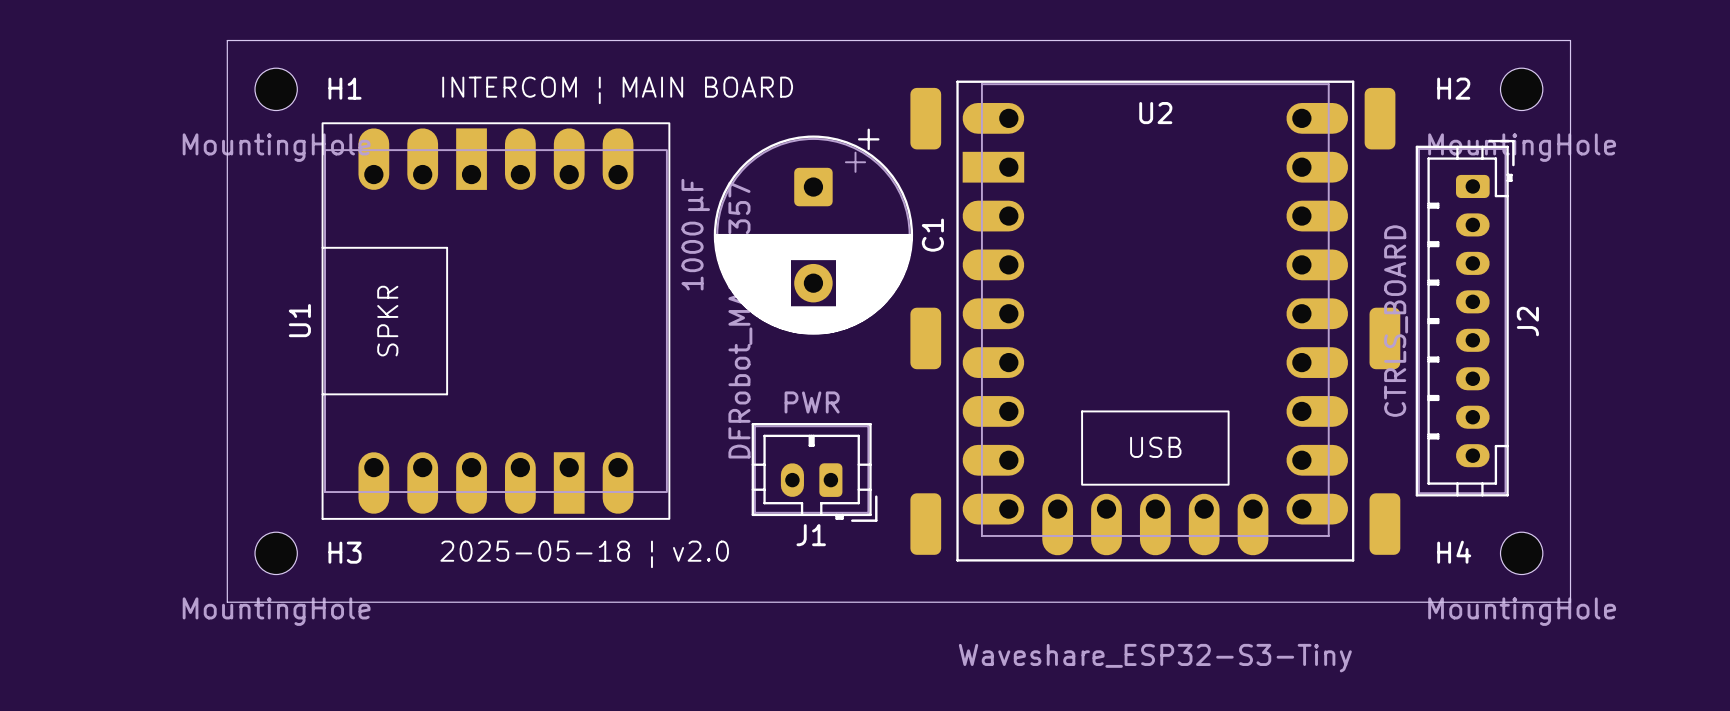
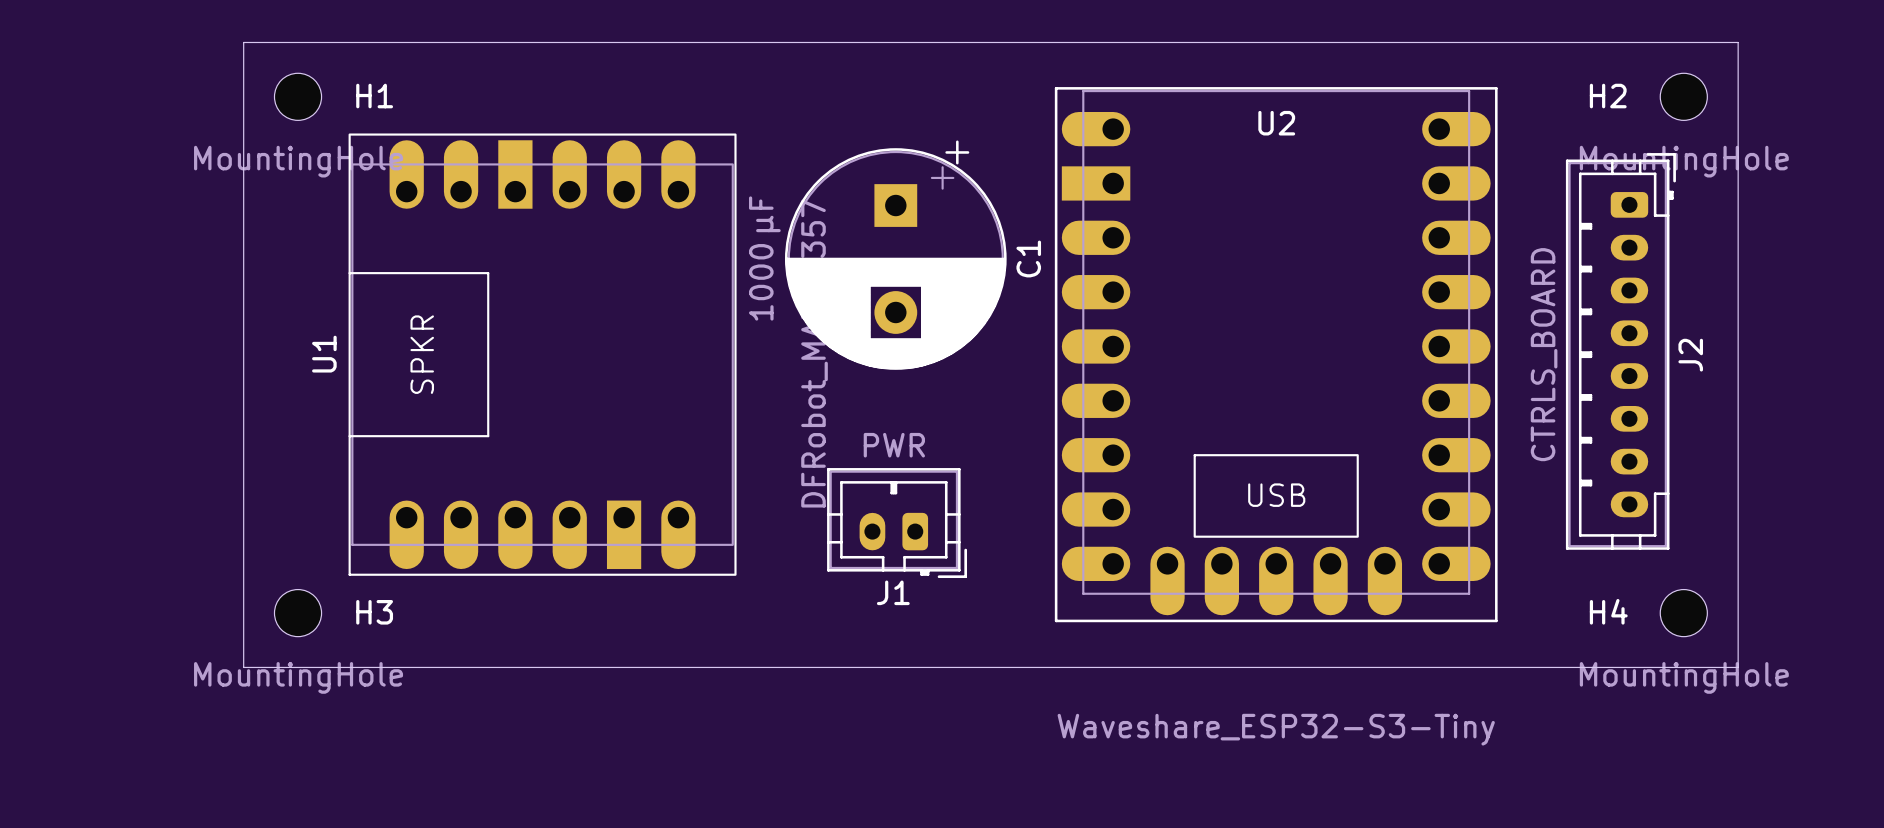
text: INTERCOM ¦ MAIN BOARD (617, 90) -> none
part: (925, 118) -> none
part: (1380, 118) -> none
C1 footprint: [713, 128, 914, 335] -> [784, 140, 1007, 370]
part: (925, 338) -> none
part: (1384, 338) -> none
part: (925, 524) -> none
part: (1384, 524) -> none
text: 2025-05-18 ¦ v2.0 (584, 554) -> none

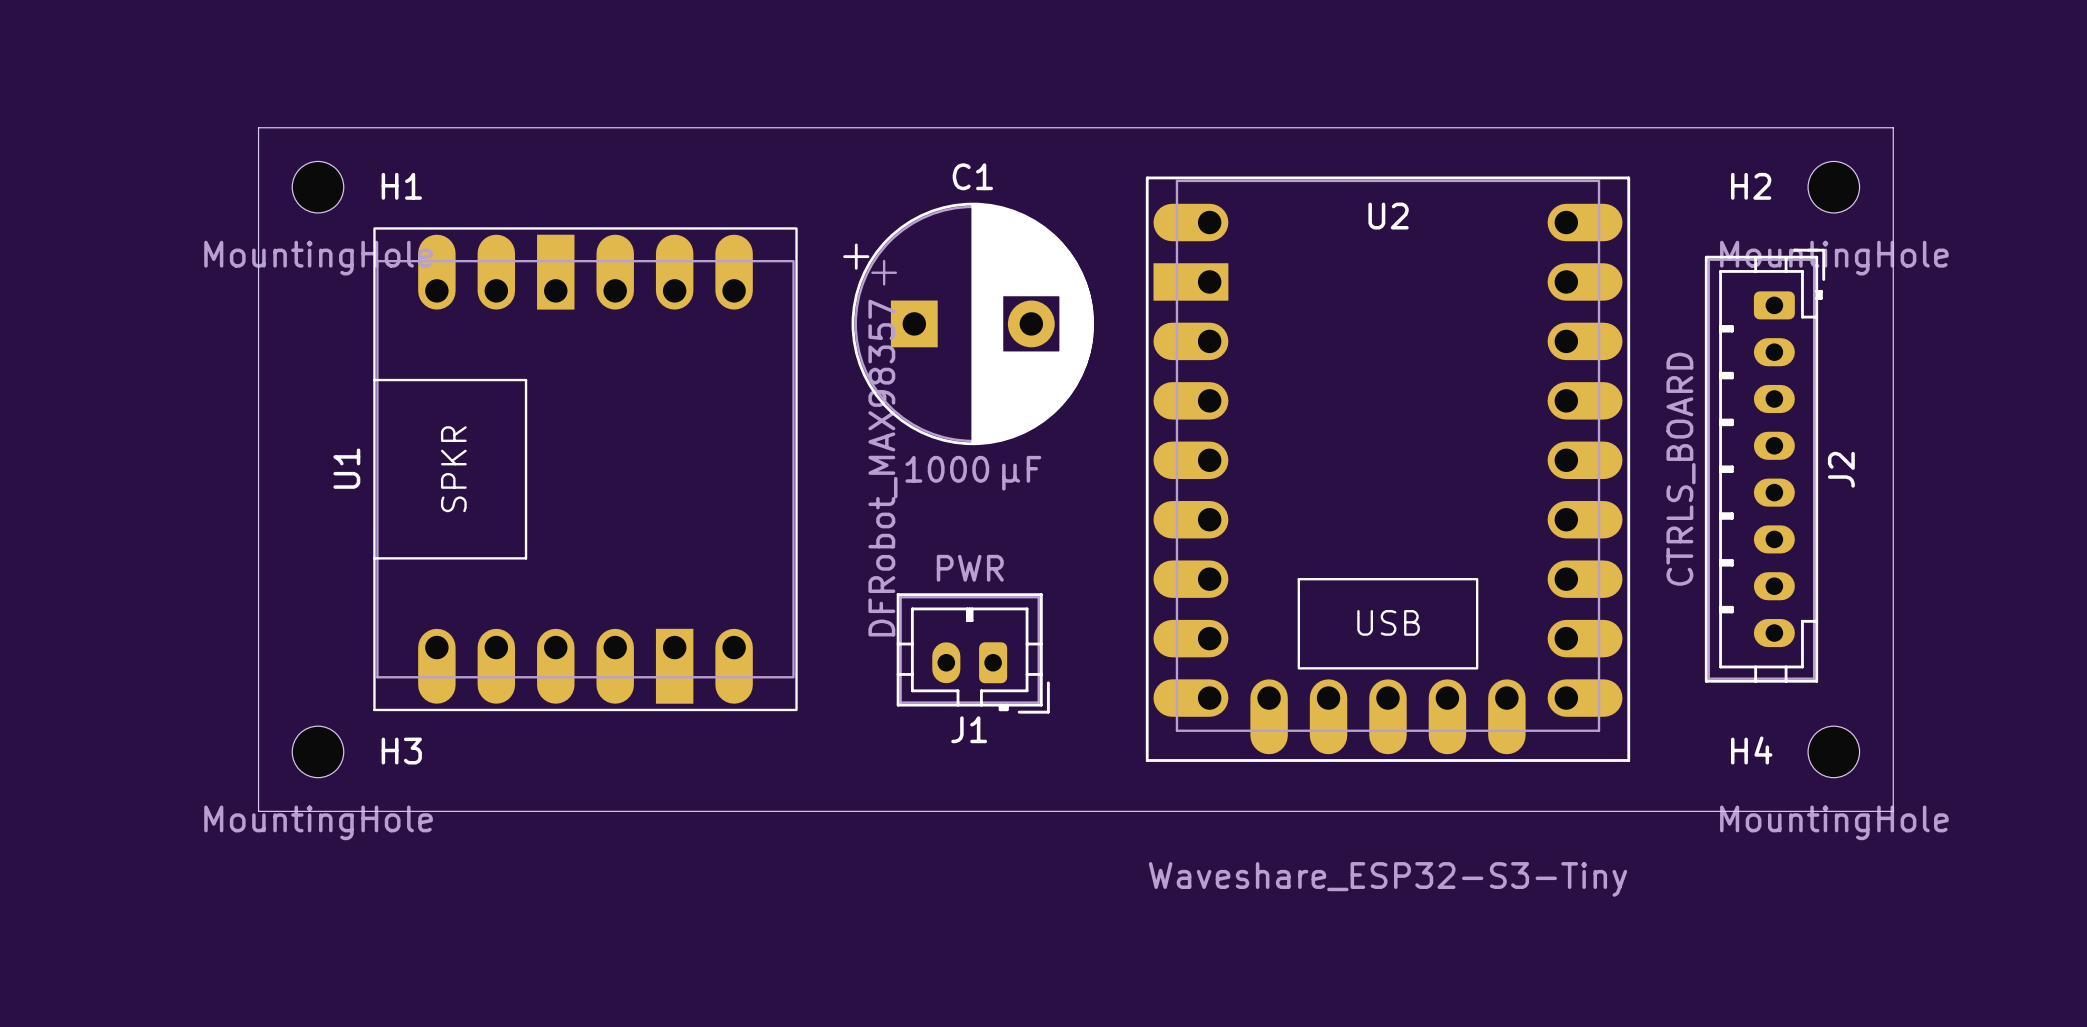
C1 rotation: 0° (895, 255) -> 90° counterclockwise (968, 323)

